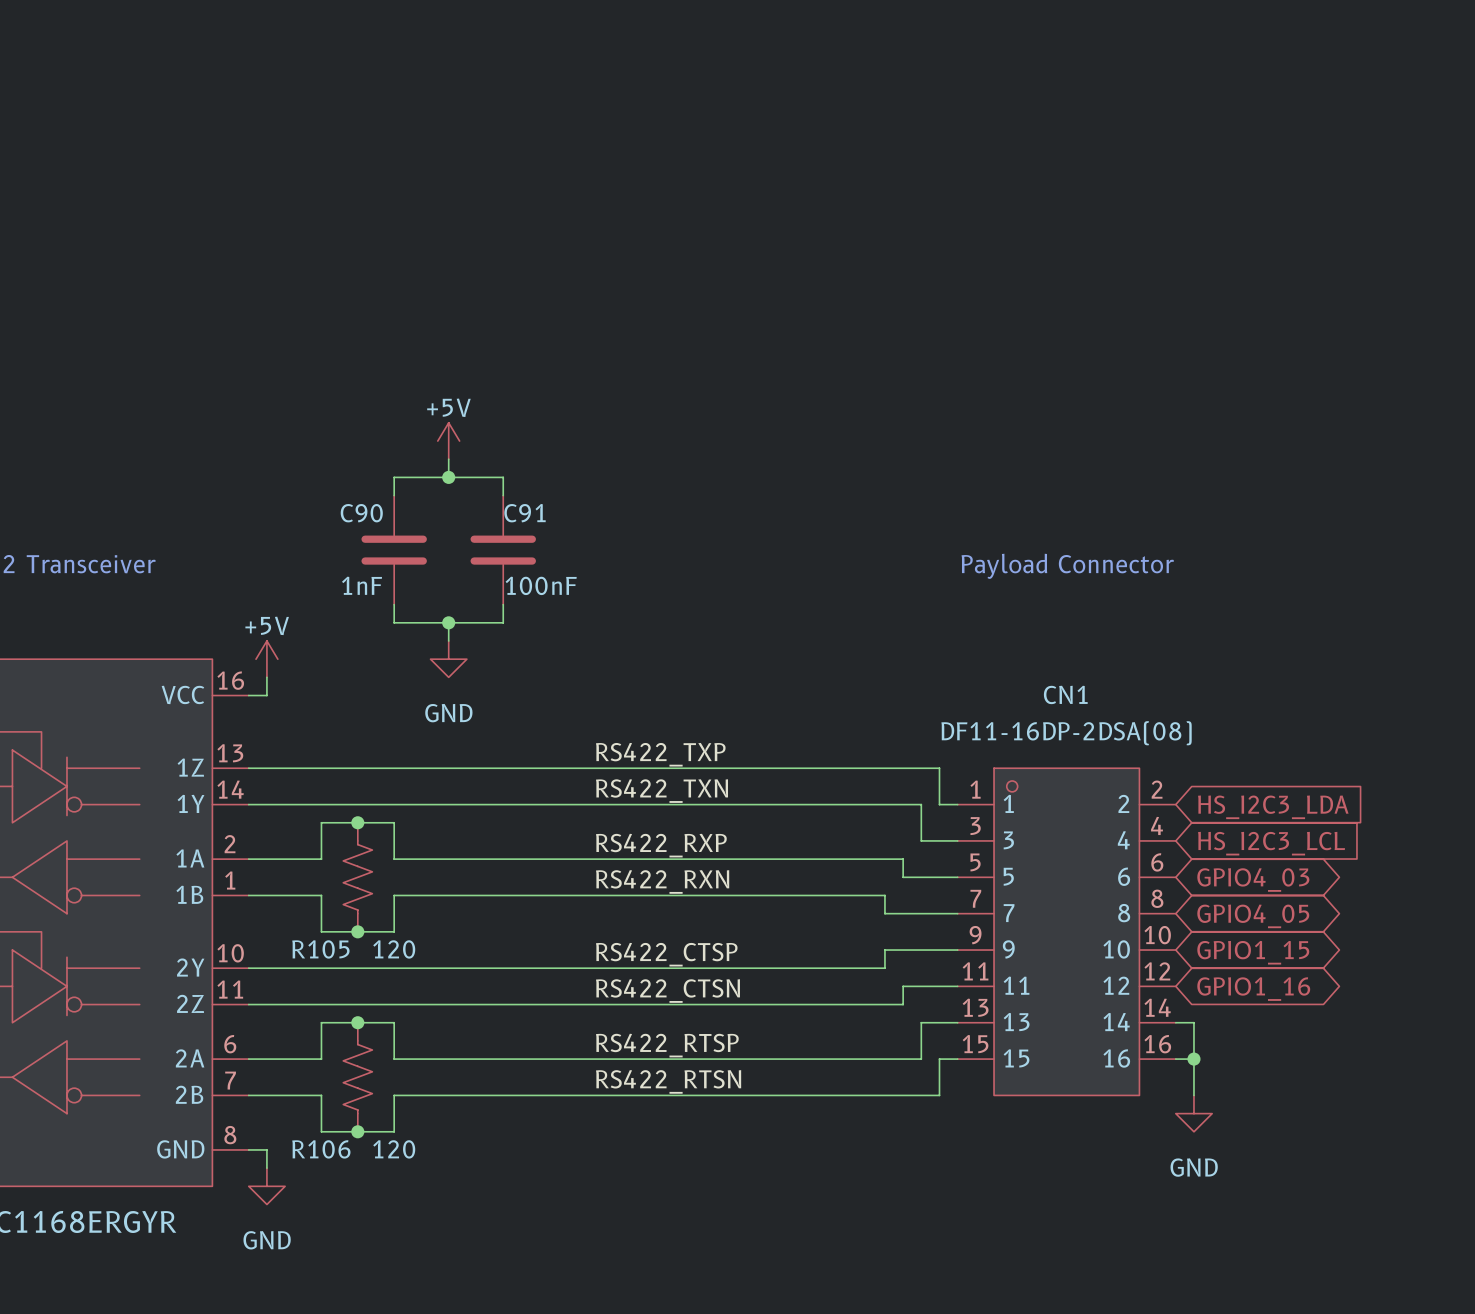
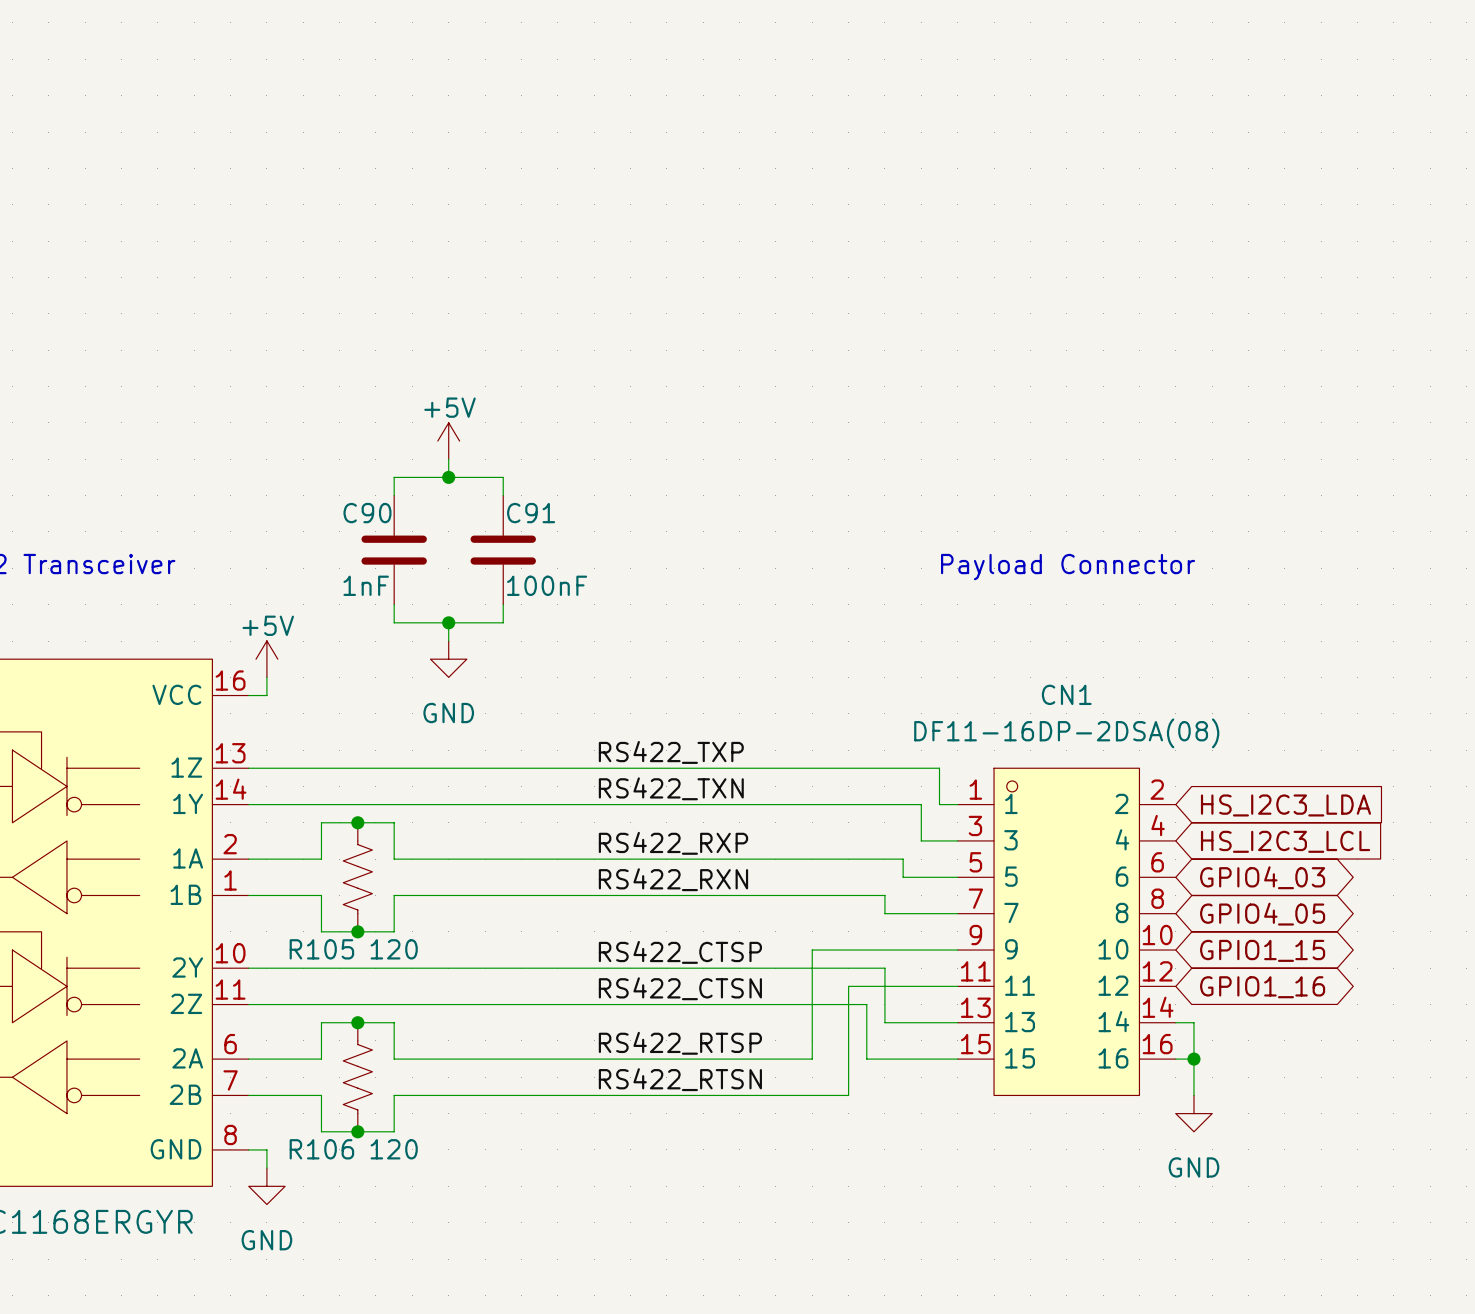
wire: (884, 950) (884, 968) -> (921, 1022) (884, 1022) (884, 968)
wire: none -> (884, 950) (812, 950) (812, 1059)
wire: (903, 986) (903, 1004) (866, 1004) -> none
wire: (921, 1022) (921, 1059) -> (939, 1059) (921, 1059)
wire: (812, 1059) (866, 1059) -> (866, 1004) (866, 1059)
wire: (939, 1059) (939, 1095) (848, 1095) -> (903, 986) (848, 986) (848, 1095)

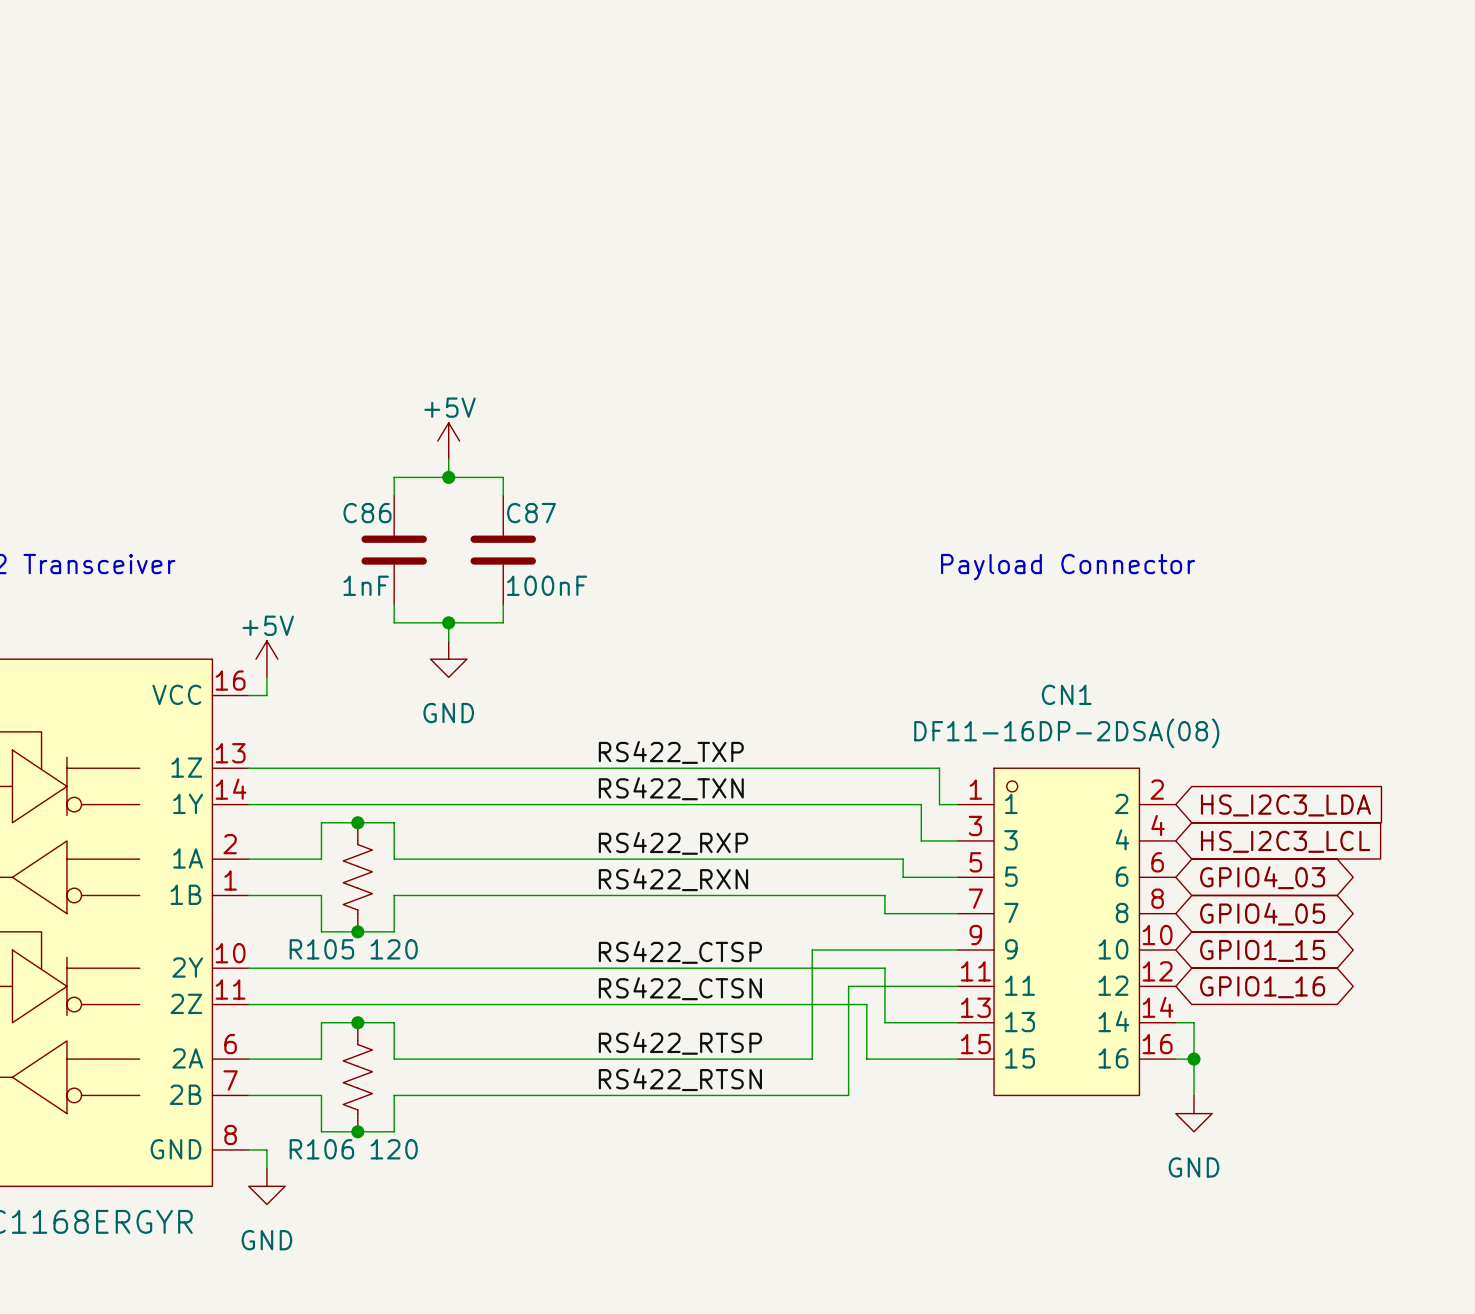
C90 name: C90 (367, 513) -> C86 (367, 513)
C91 name: C91 (531, 513) -> C87 (531, 513)

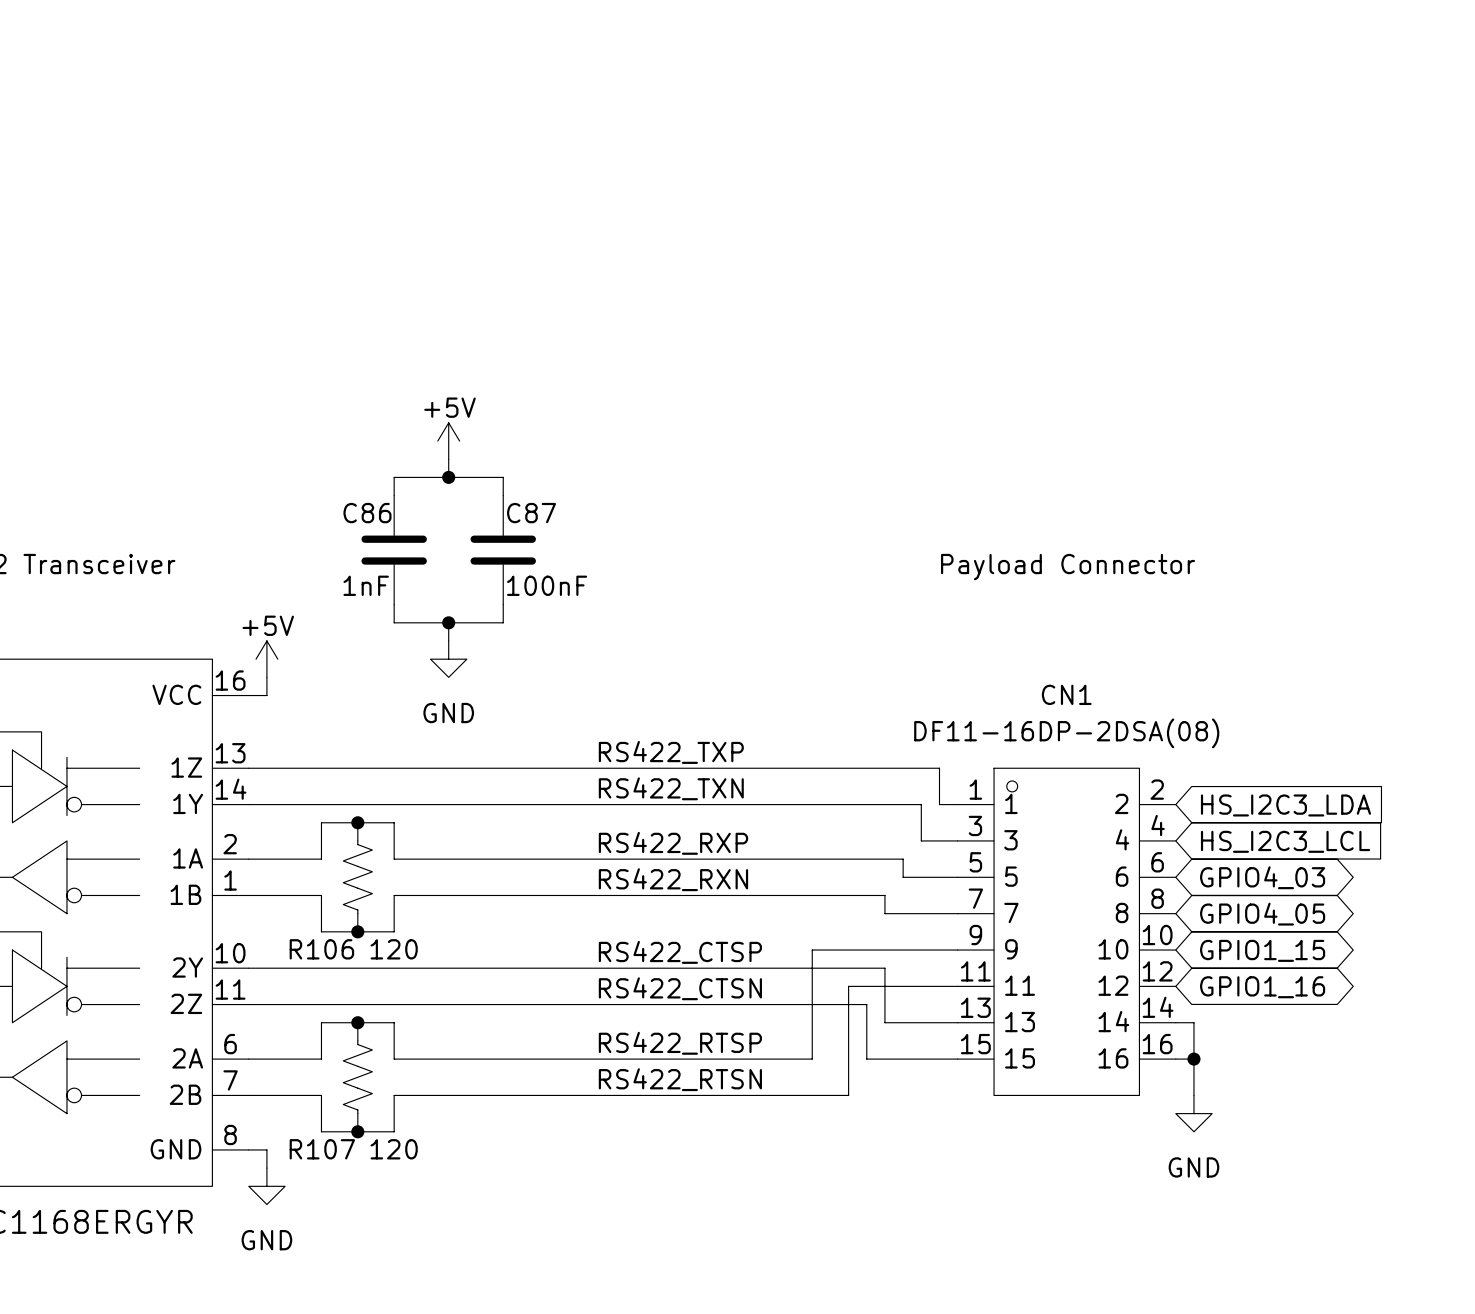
R105 name: R105 (321, 949) -> R106 (321, 949)
R106 name: R106 (321, 1149) -> R107 (322, 1149)

